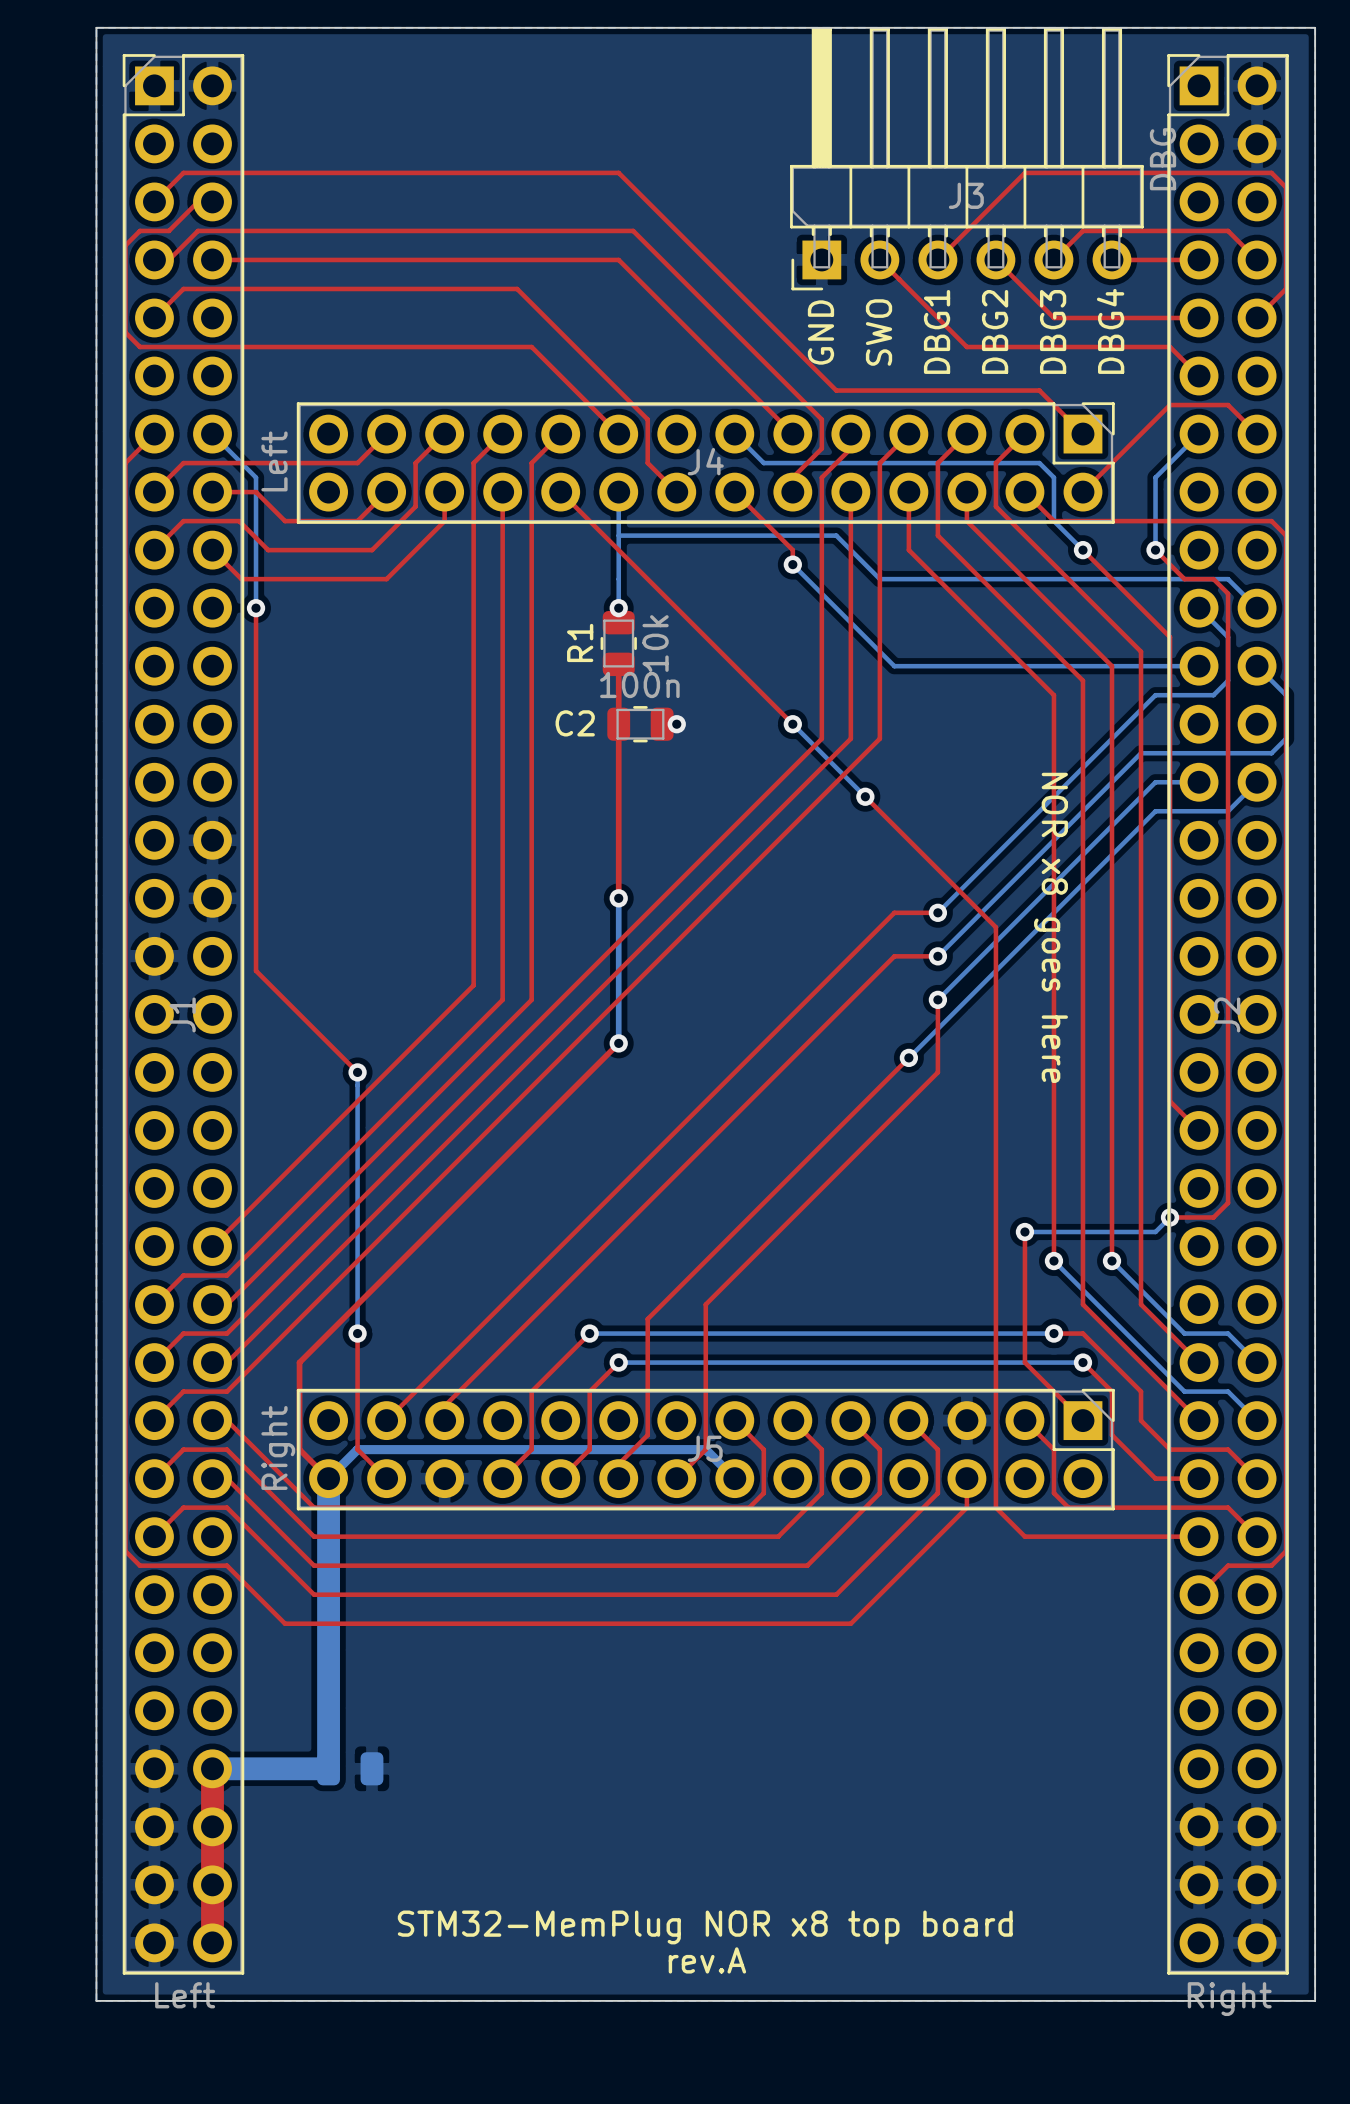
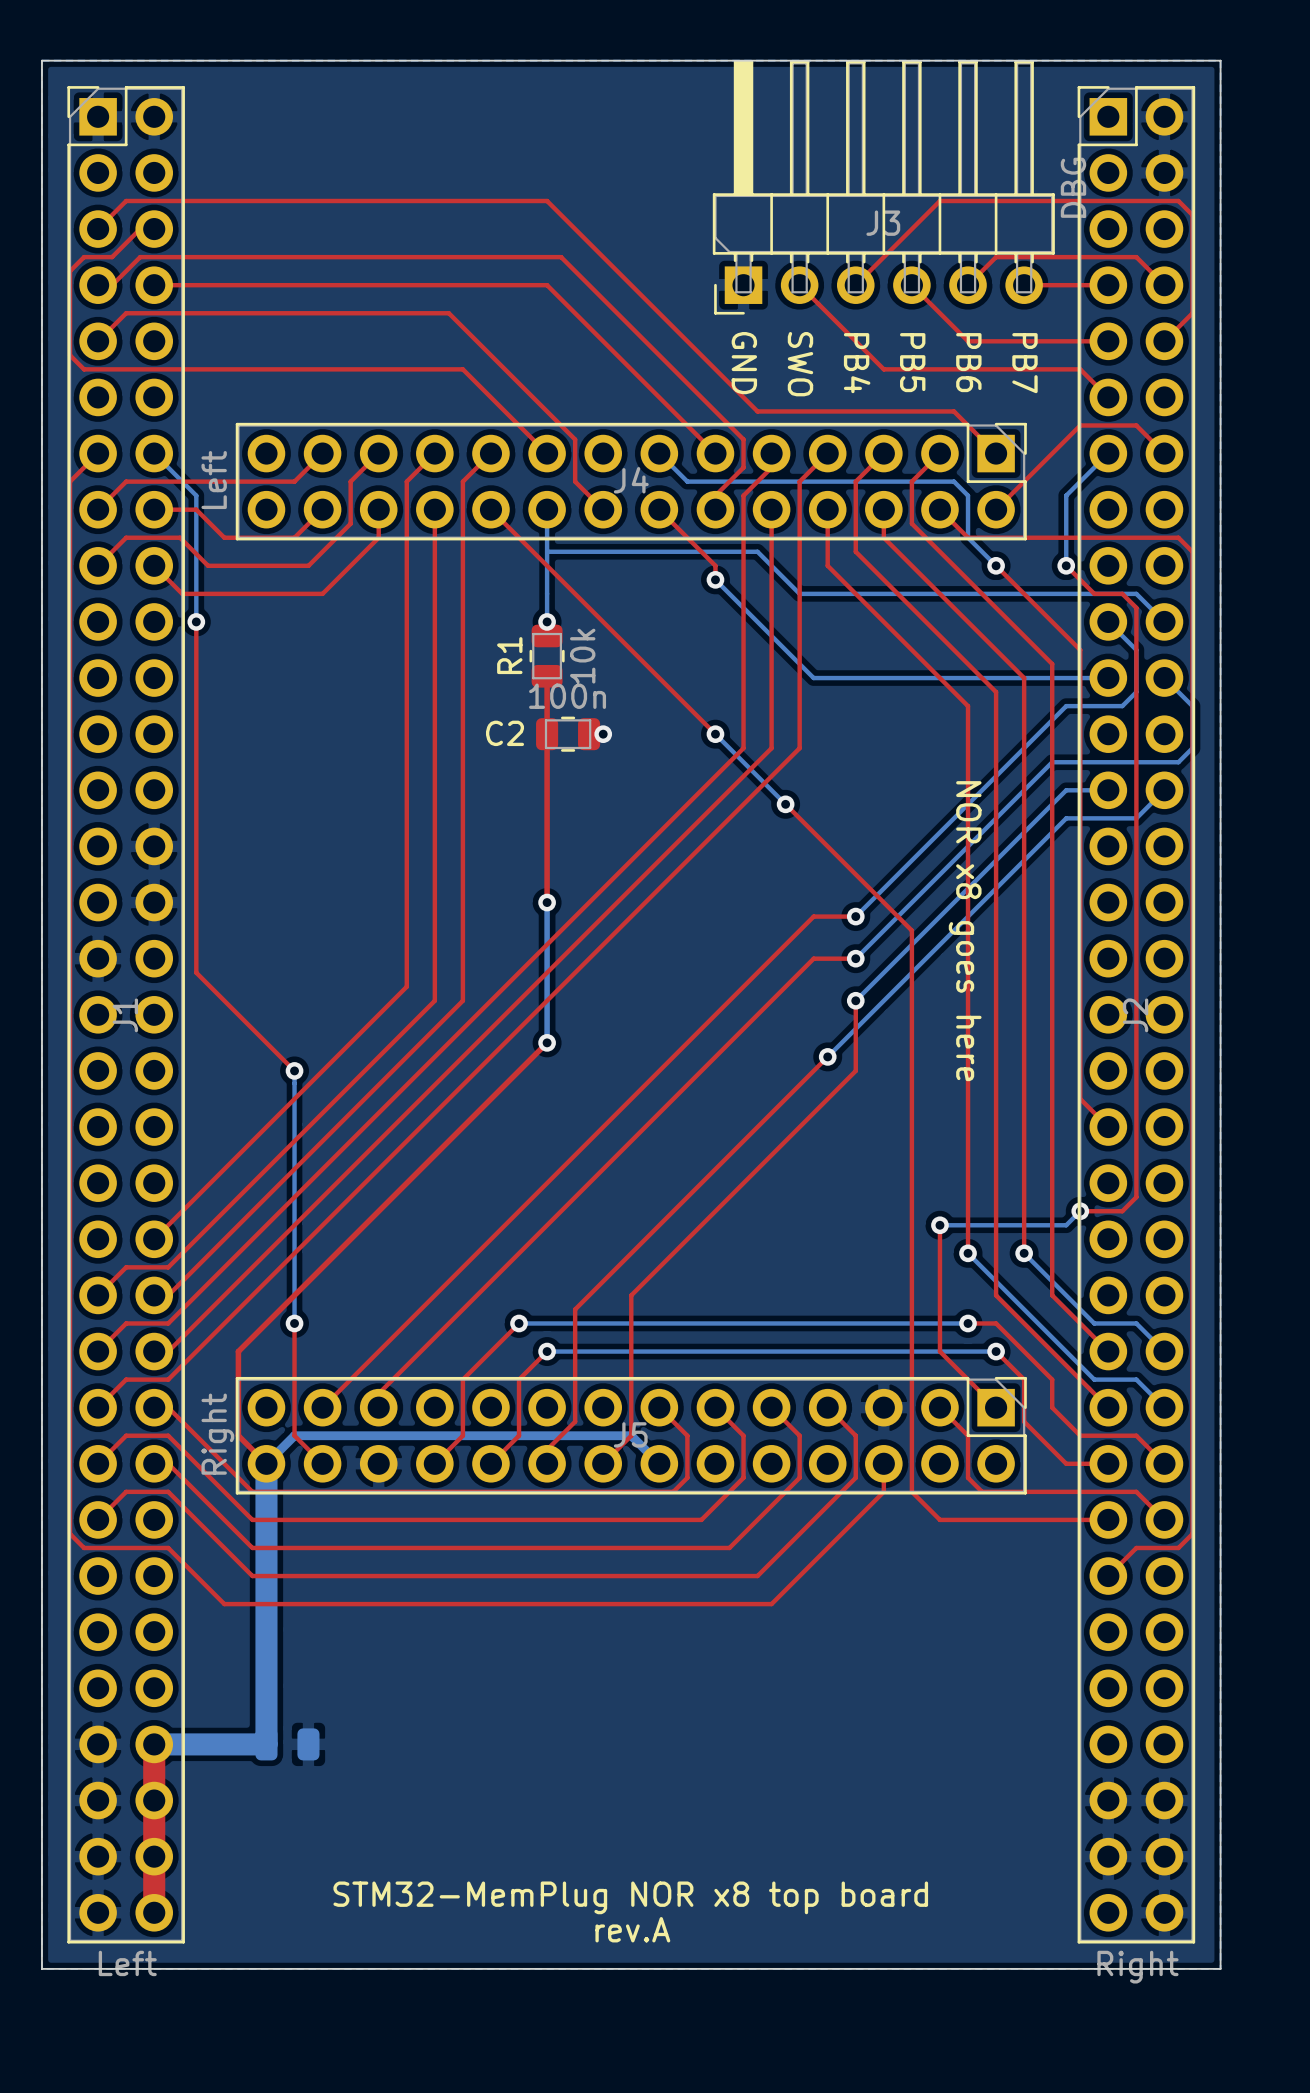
text: DBG1 (937, 331) -> none
text: DBG2 (995, 331) -> none
text: DBG3 (1053, 331) -> none
text: DBG4 (1110, 331) -> none
text rotation: 0° (820, 332) -> 180° (744, 363)
text rotation: 0° (879, 332) -> 180° (800, 364)
text: none -> PB4 (857, 363)
text: none -> PB5 (912, 362)
text: none -> PB6 (968, 362)
text: none -> PB7 (1024, 363)

